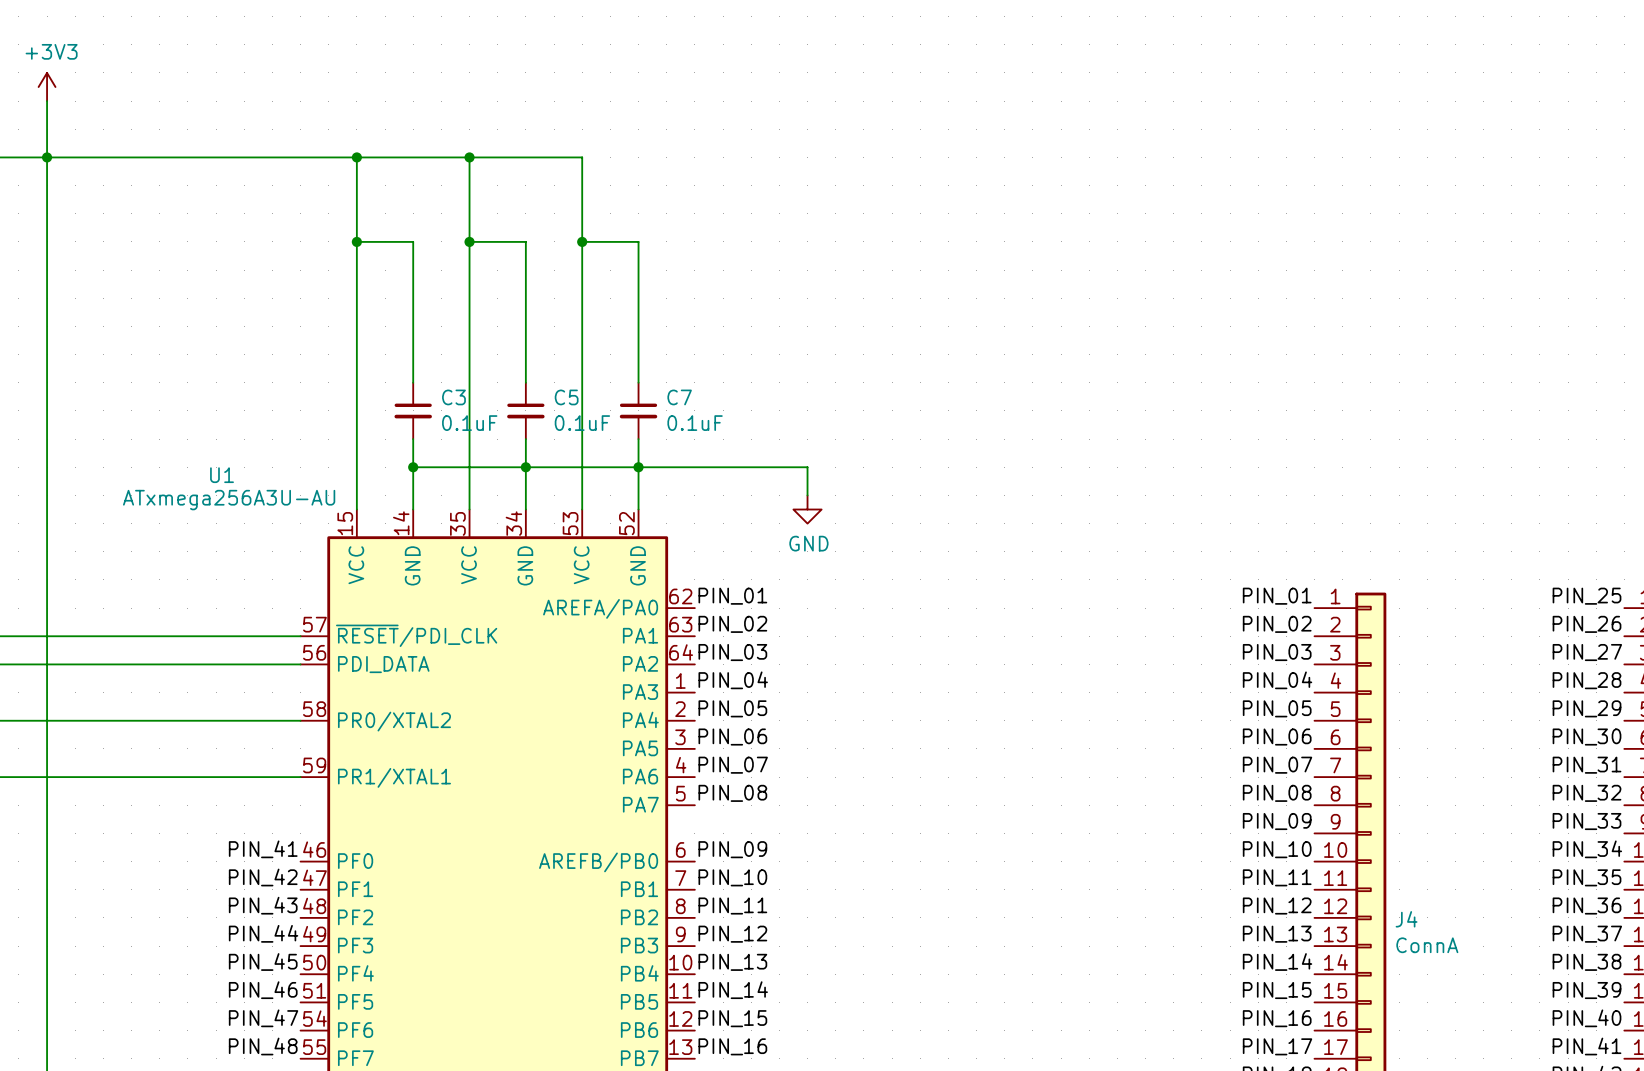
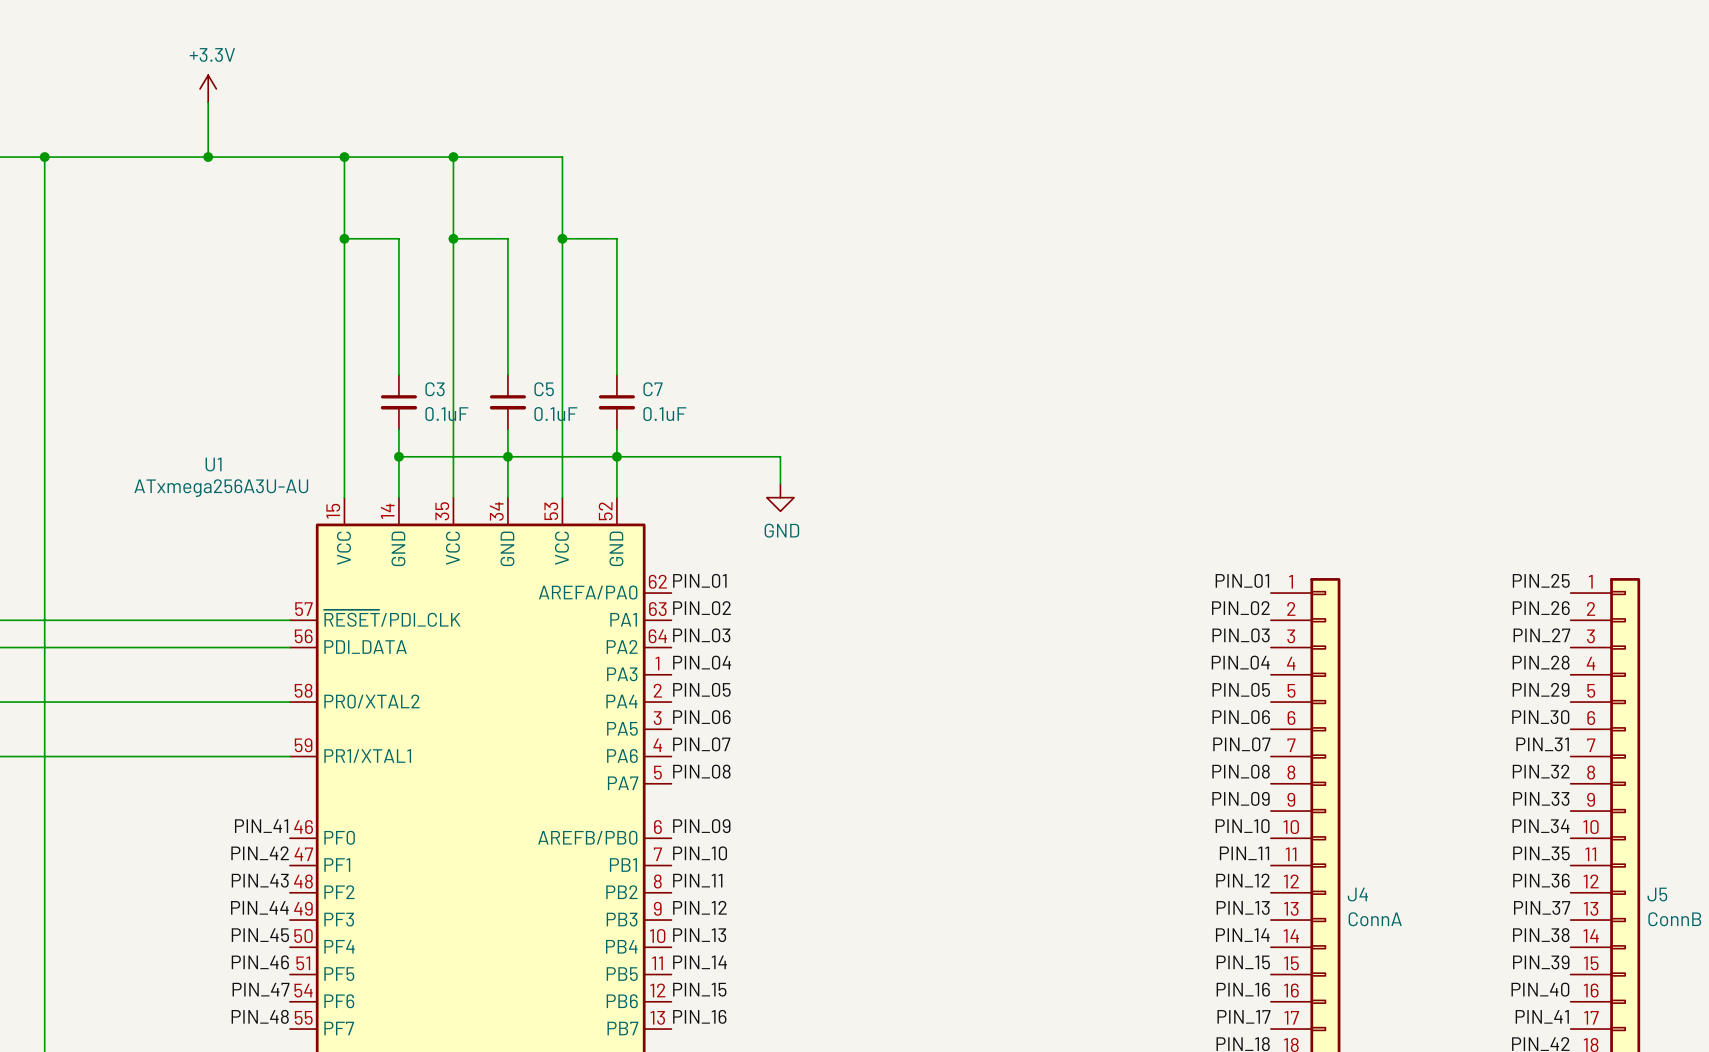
power symbol: +3V3 (47, 87) -> none
power symbol: none -> +3.3V (208, 88)
wire: (47, 101) (47, 157) -> (208, 102) (208, 157)
junction: none -> (208, 157)

